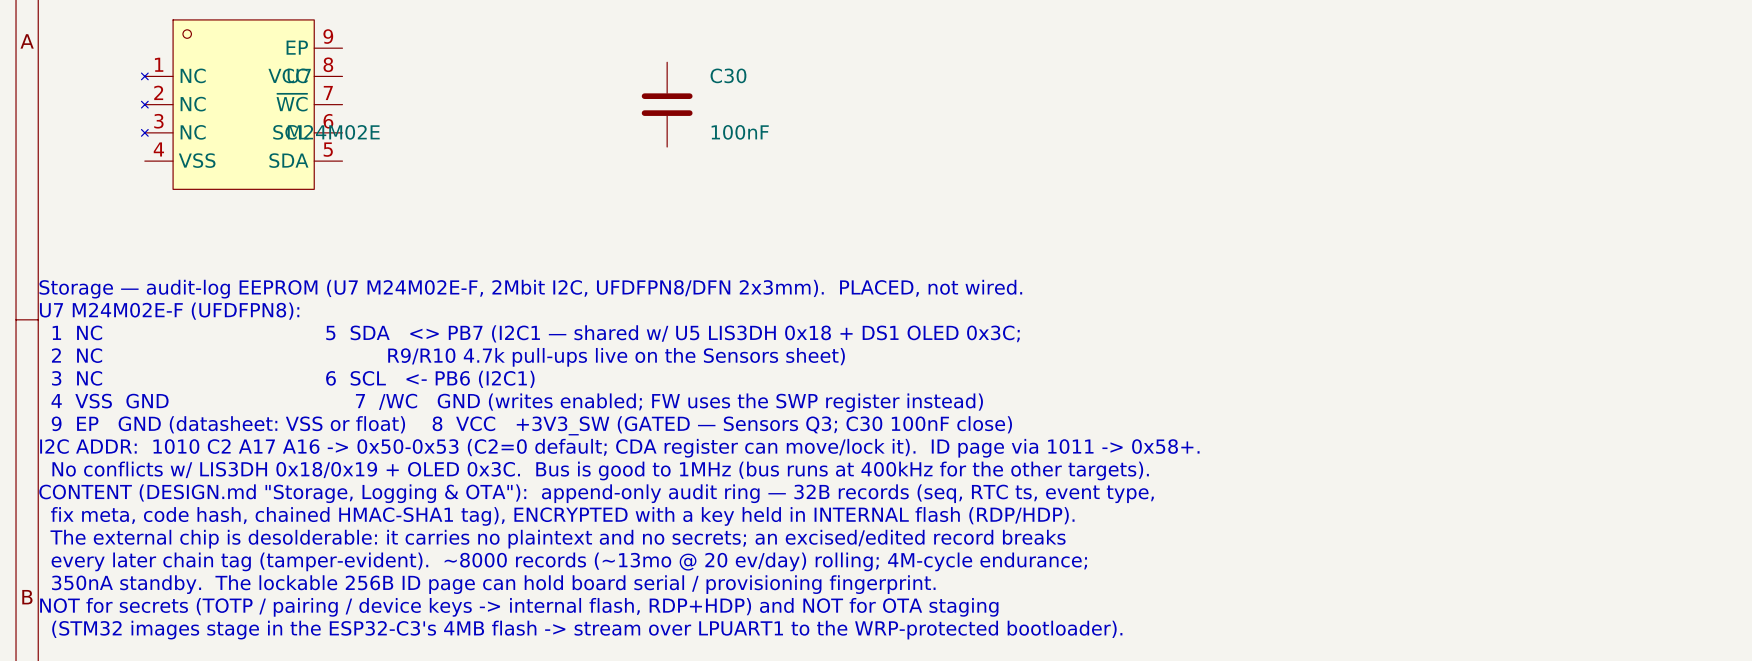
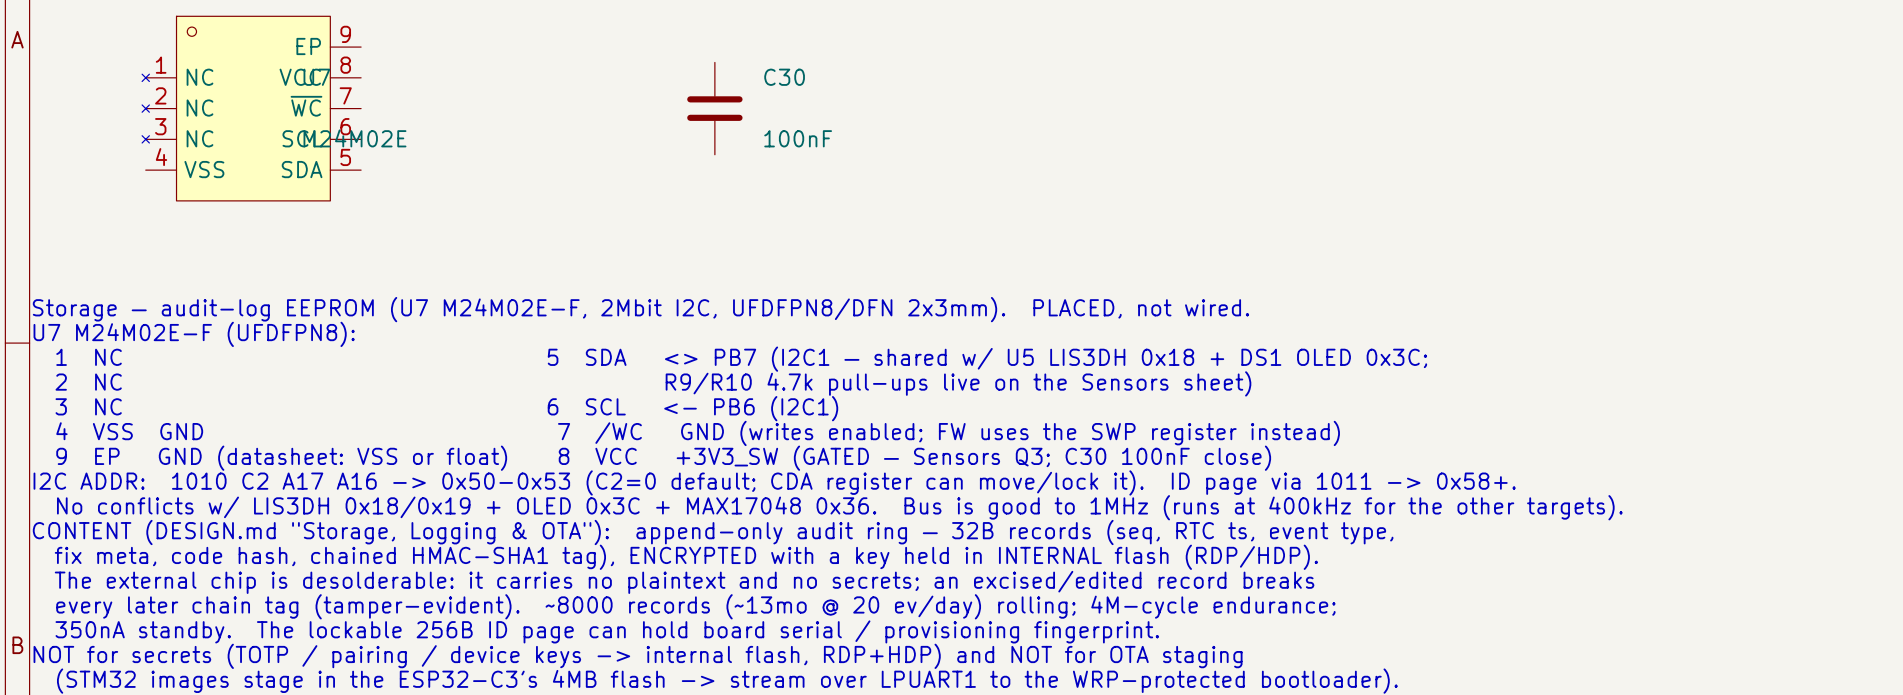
text: No conflicts w/ LIS3DH 0x18/0x19 + OLED 0x3C. Bus is good to 1MHz (bus runs at 400kHz for the other targets). (600, 470) -> No conflicts w/ LIS3DH 0x18/0x19 + OLED 0x3C + MAX17048 0x36. Bus is good to 1MHz (runs at 400kHz for the other targets). (839, 507)

